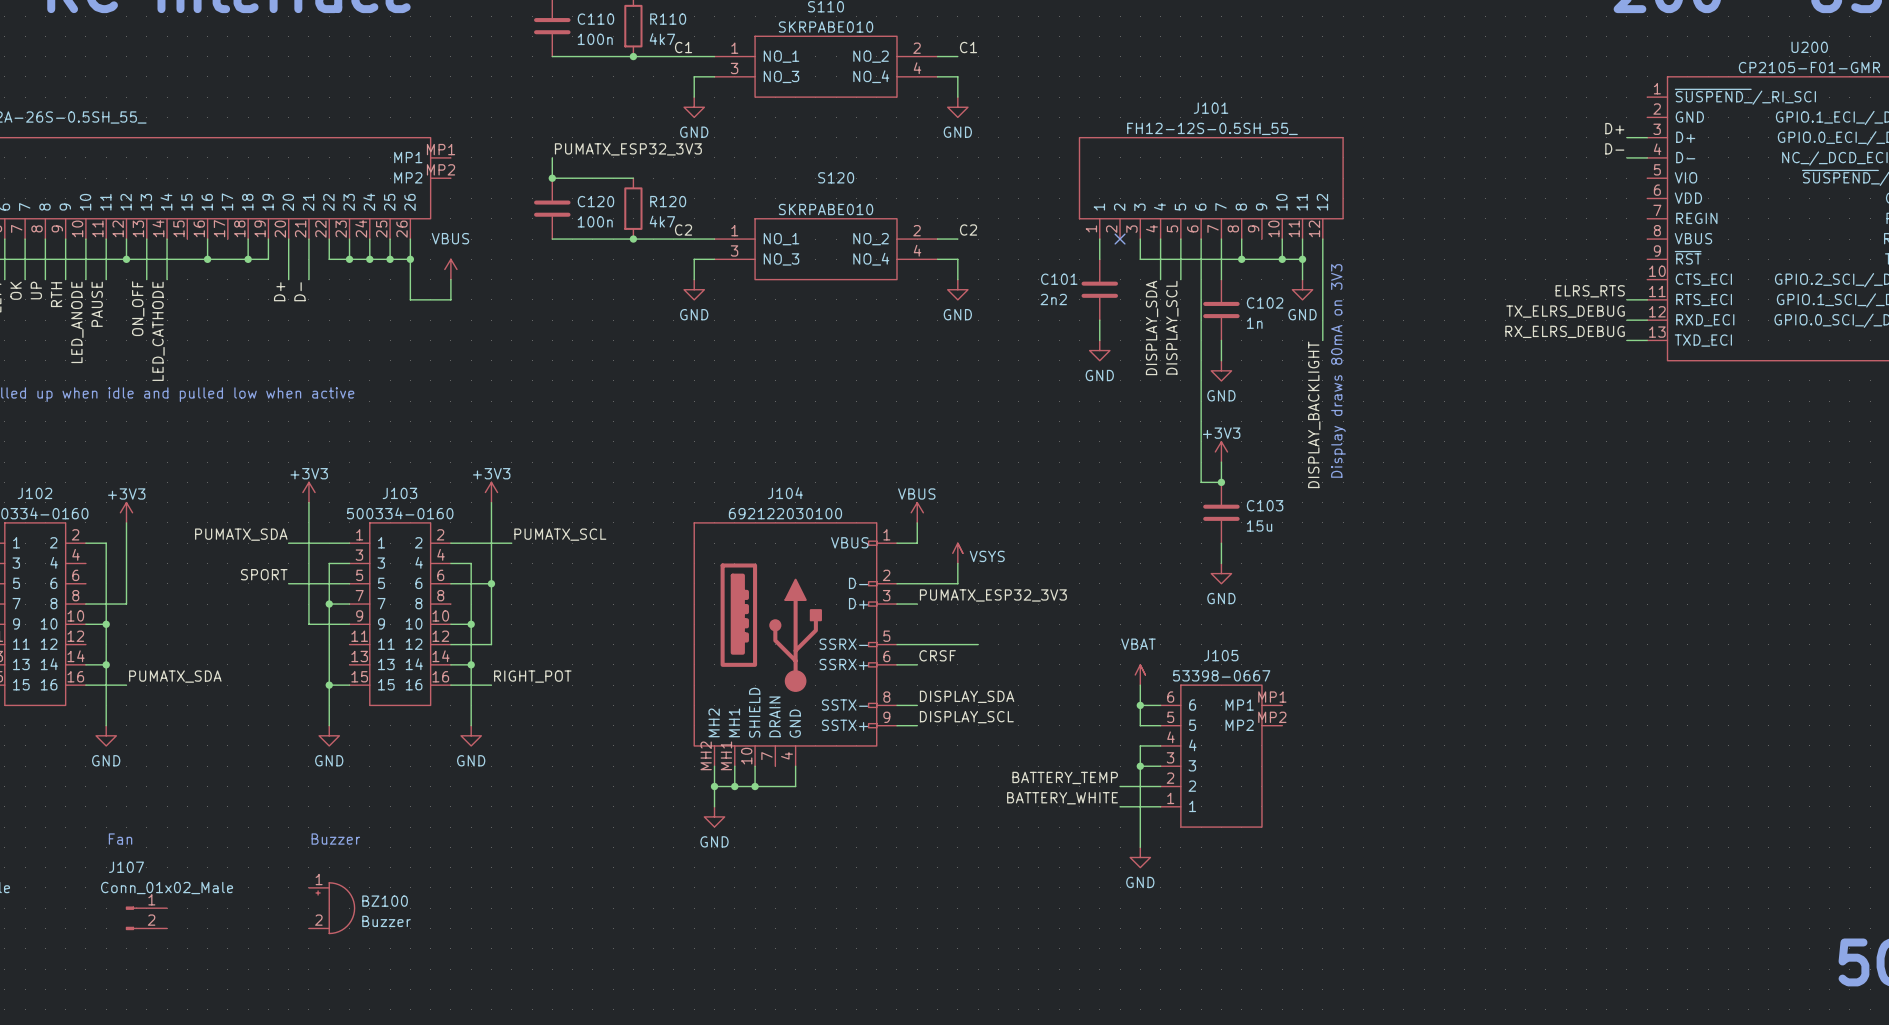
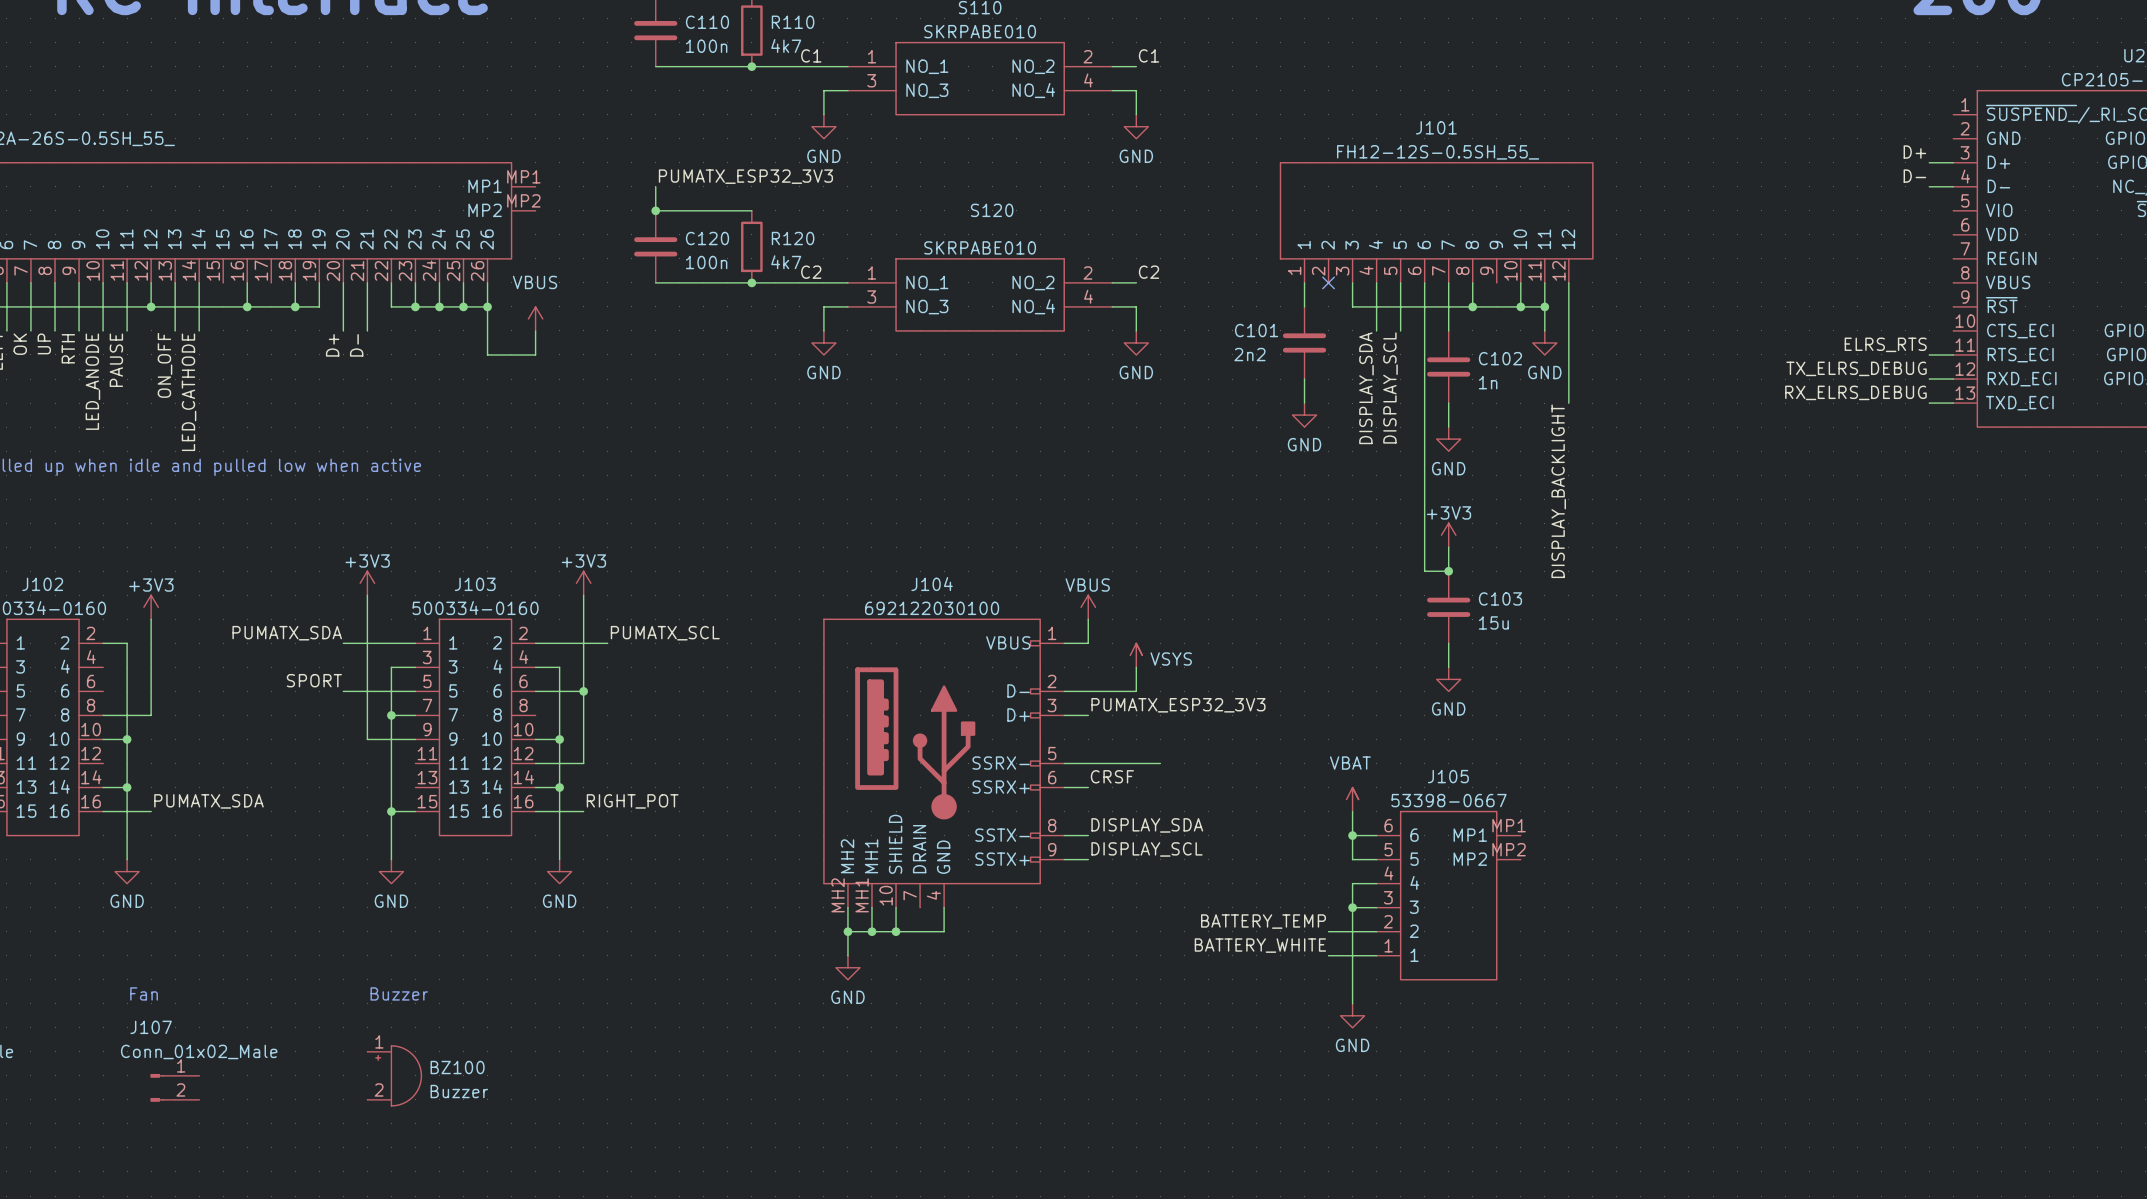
text: Display draws 80mA on 3V3 (1338, 370) -> none

